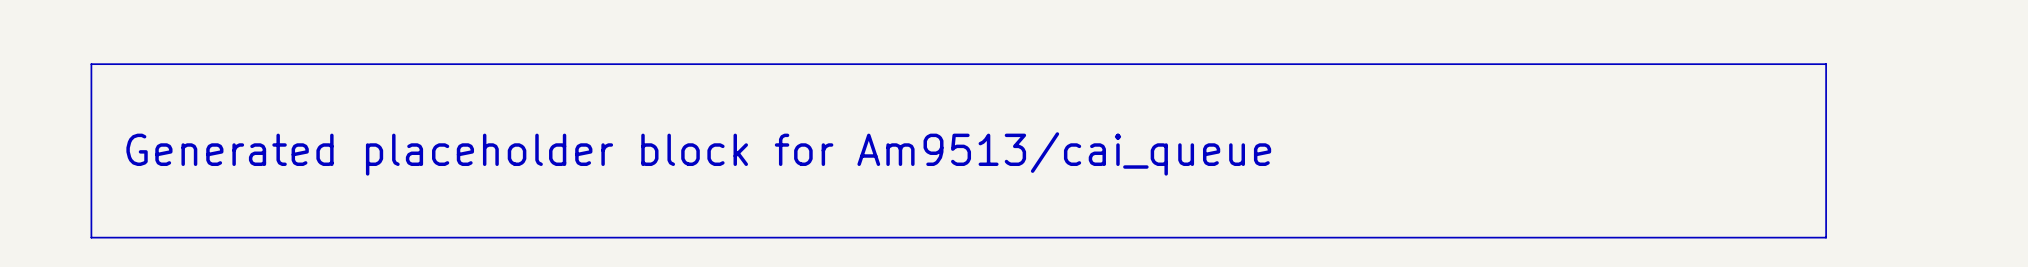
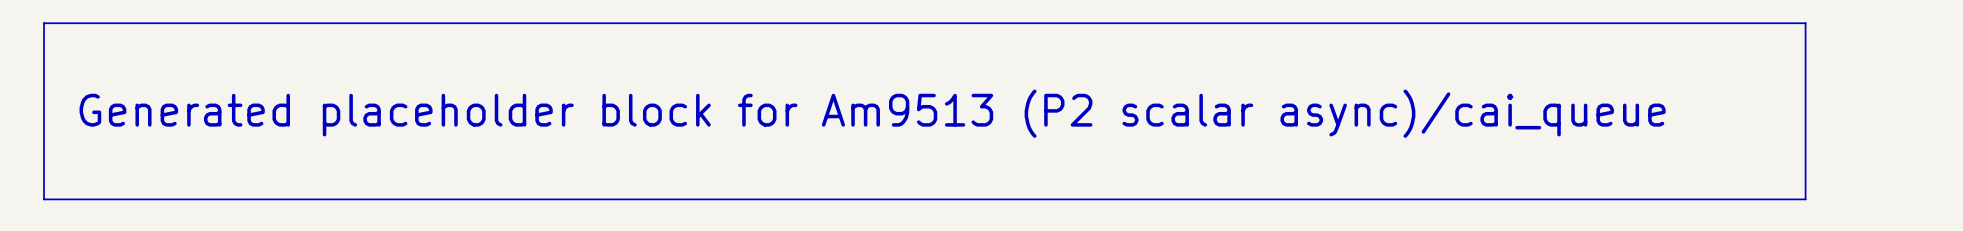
text: Generated placeholder block for Am9513/cai_queue (698, 153) -> Generated placeholder block for Am9513 (P2 scalar async)/cai_queue (872, 113)

